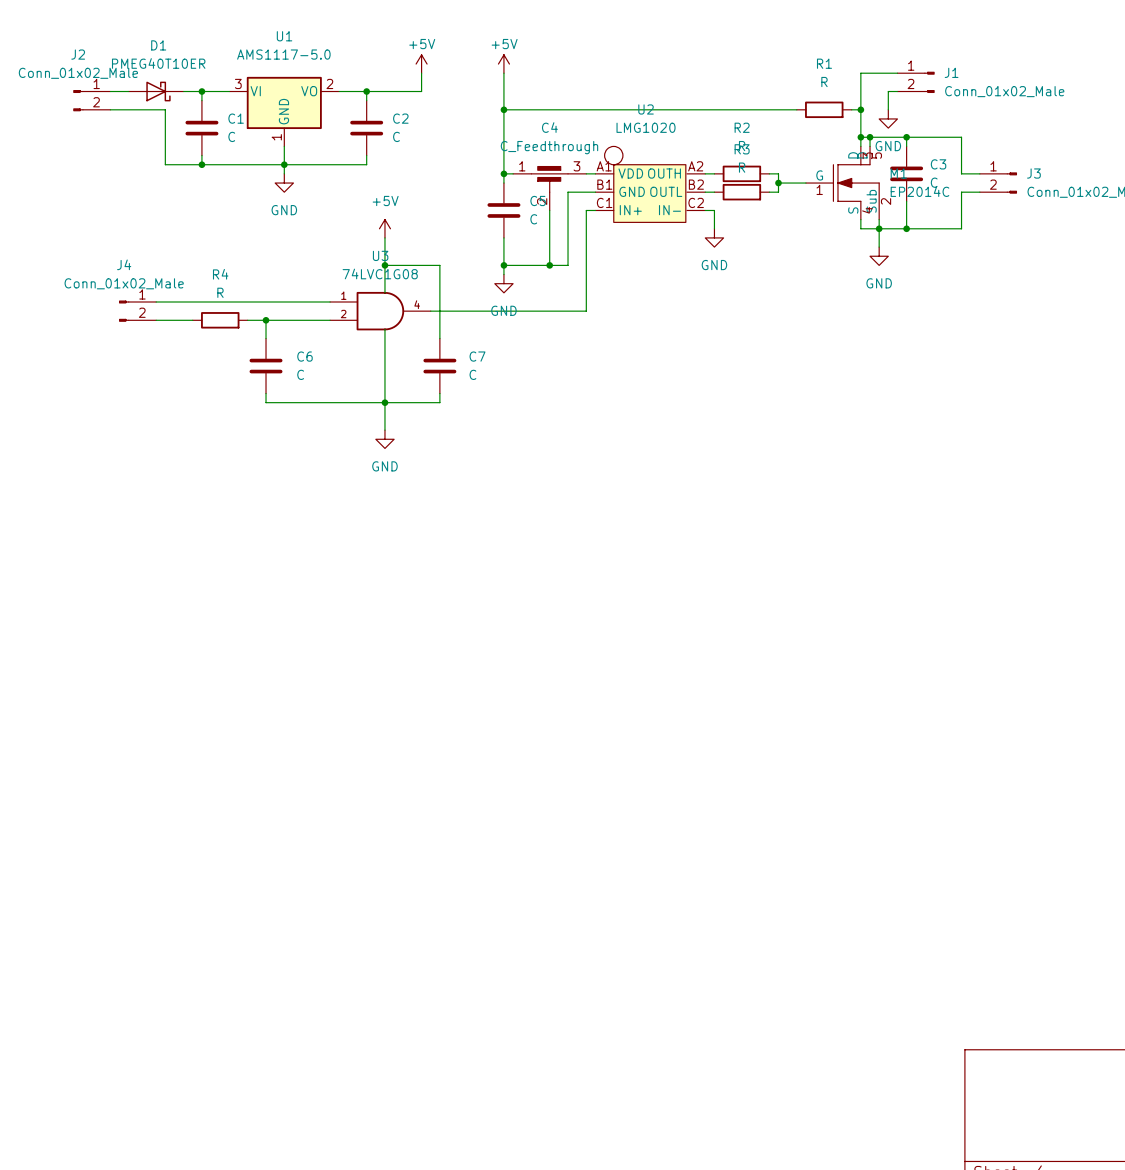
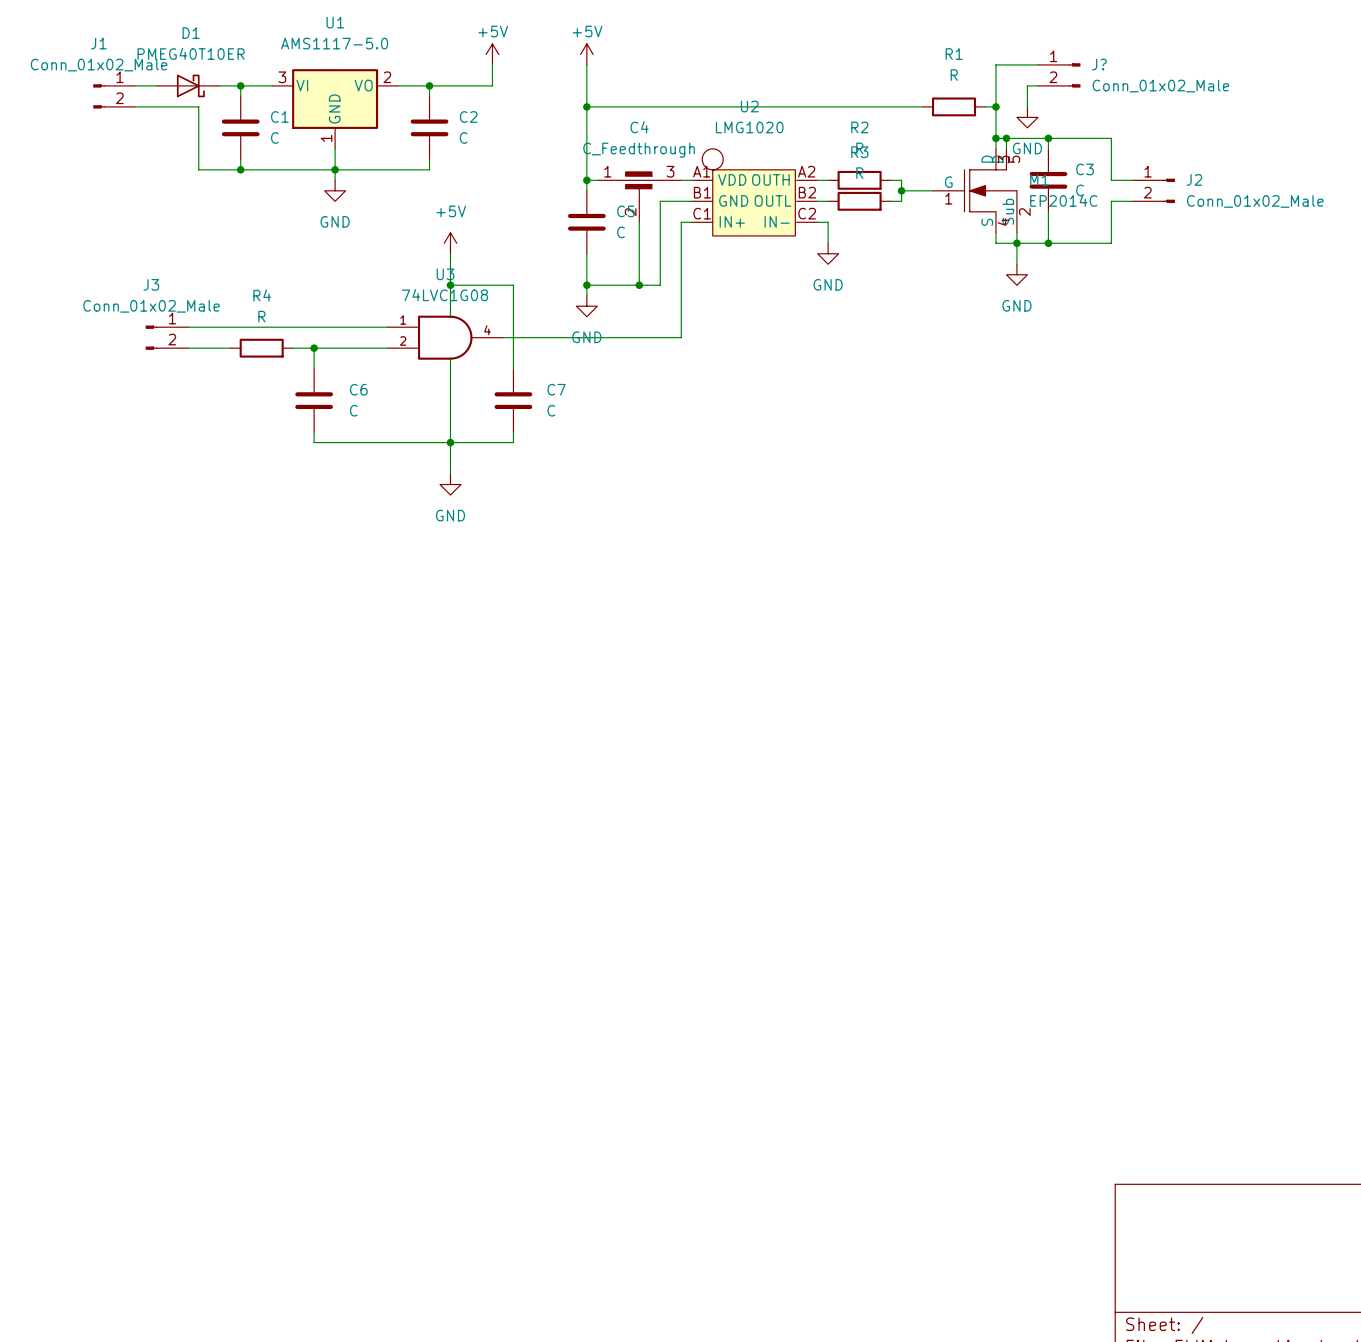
J2 name: J2 (78, 54) -> J1 (98, 43)
J1 name: J1 (951, 72) -> J? (1099, 64)
J3 name: J3 (1033, 173) -> J2 (1194, 179)
J4 name: J4 (124, 264) -> J3 (151, 284)

